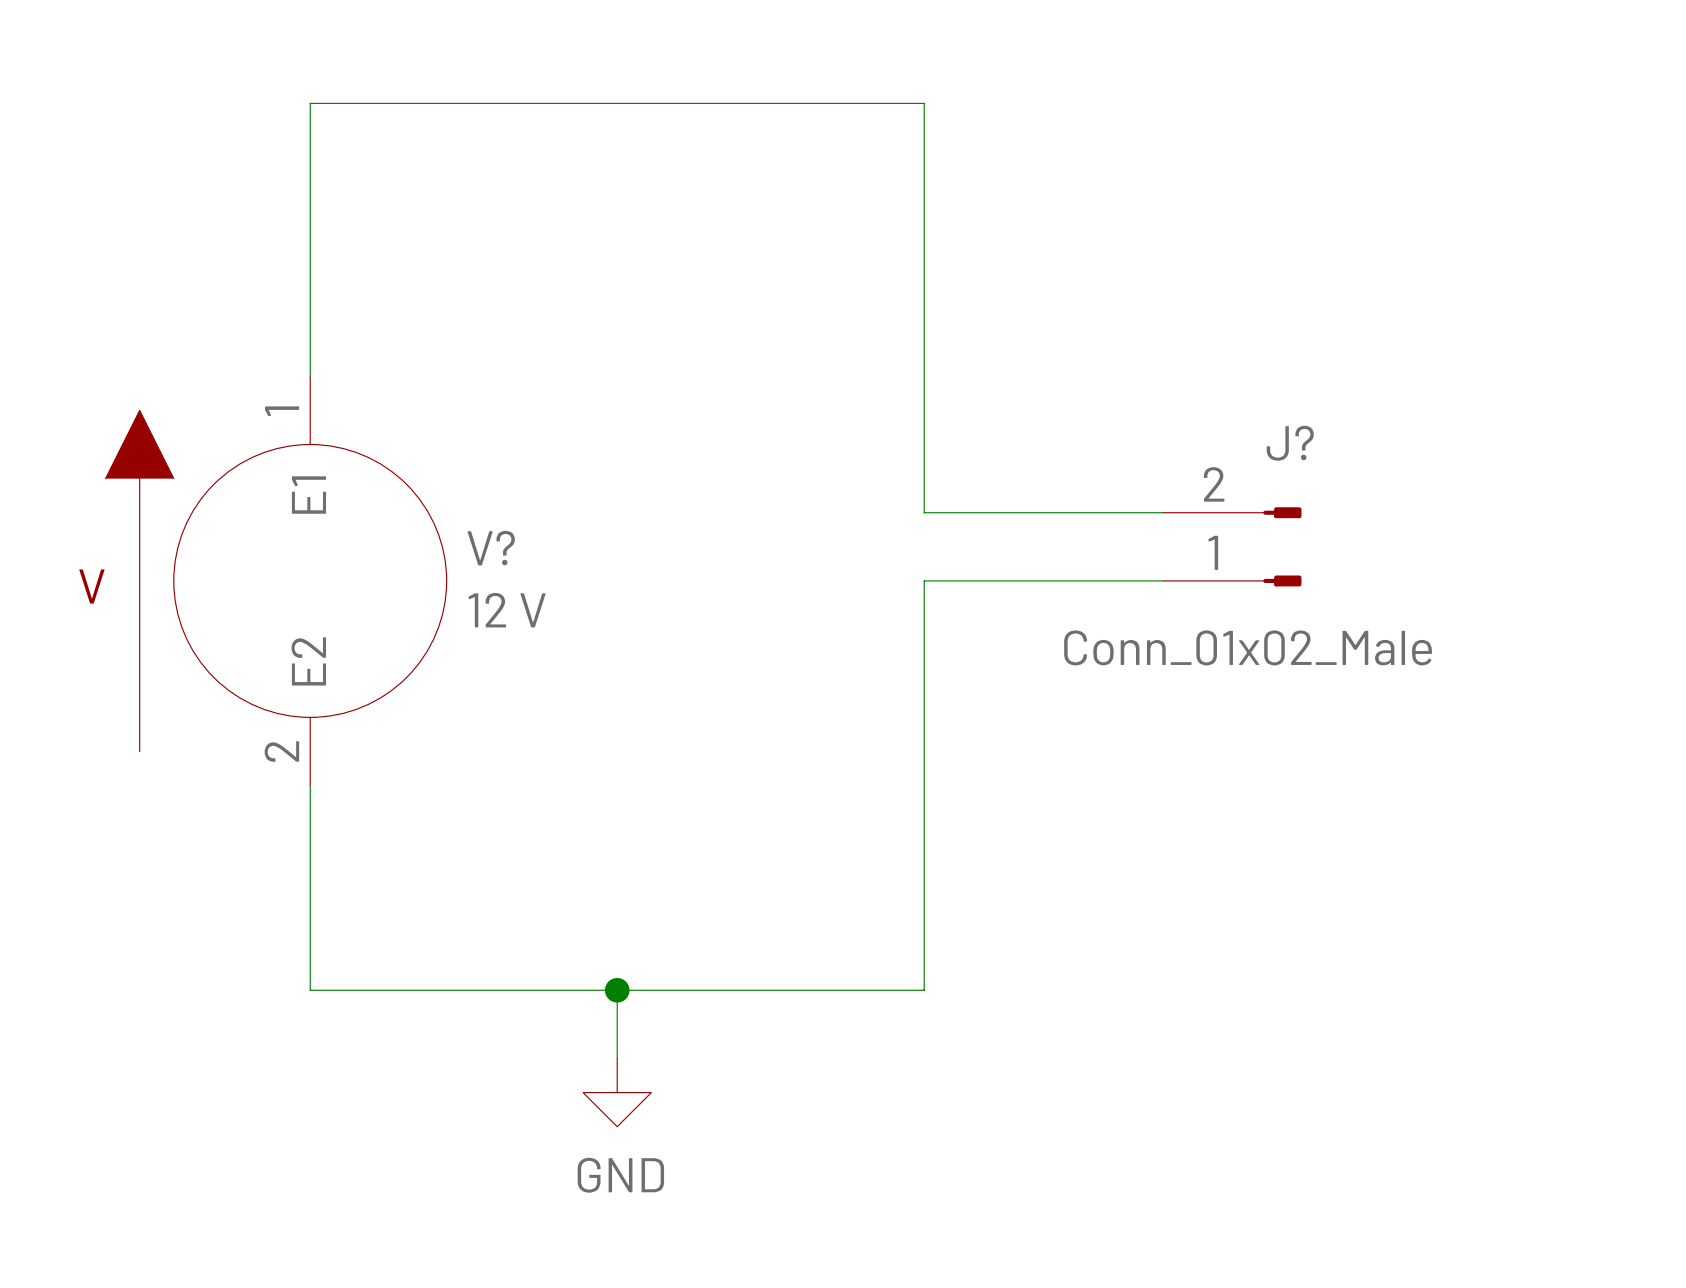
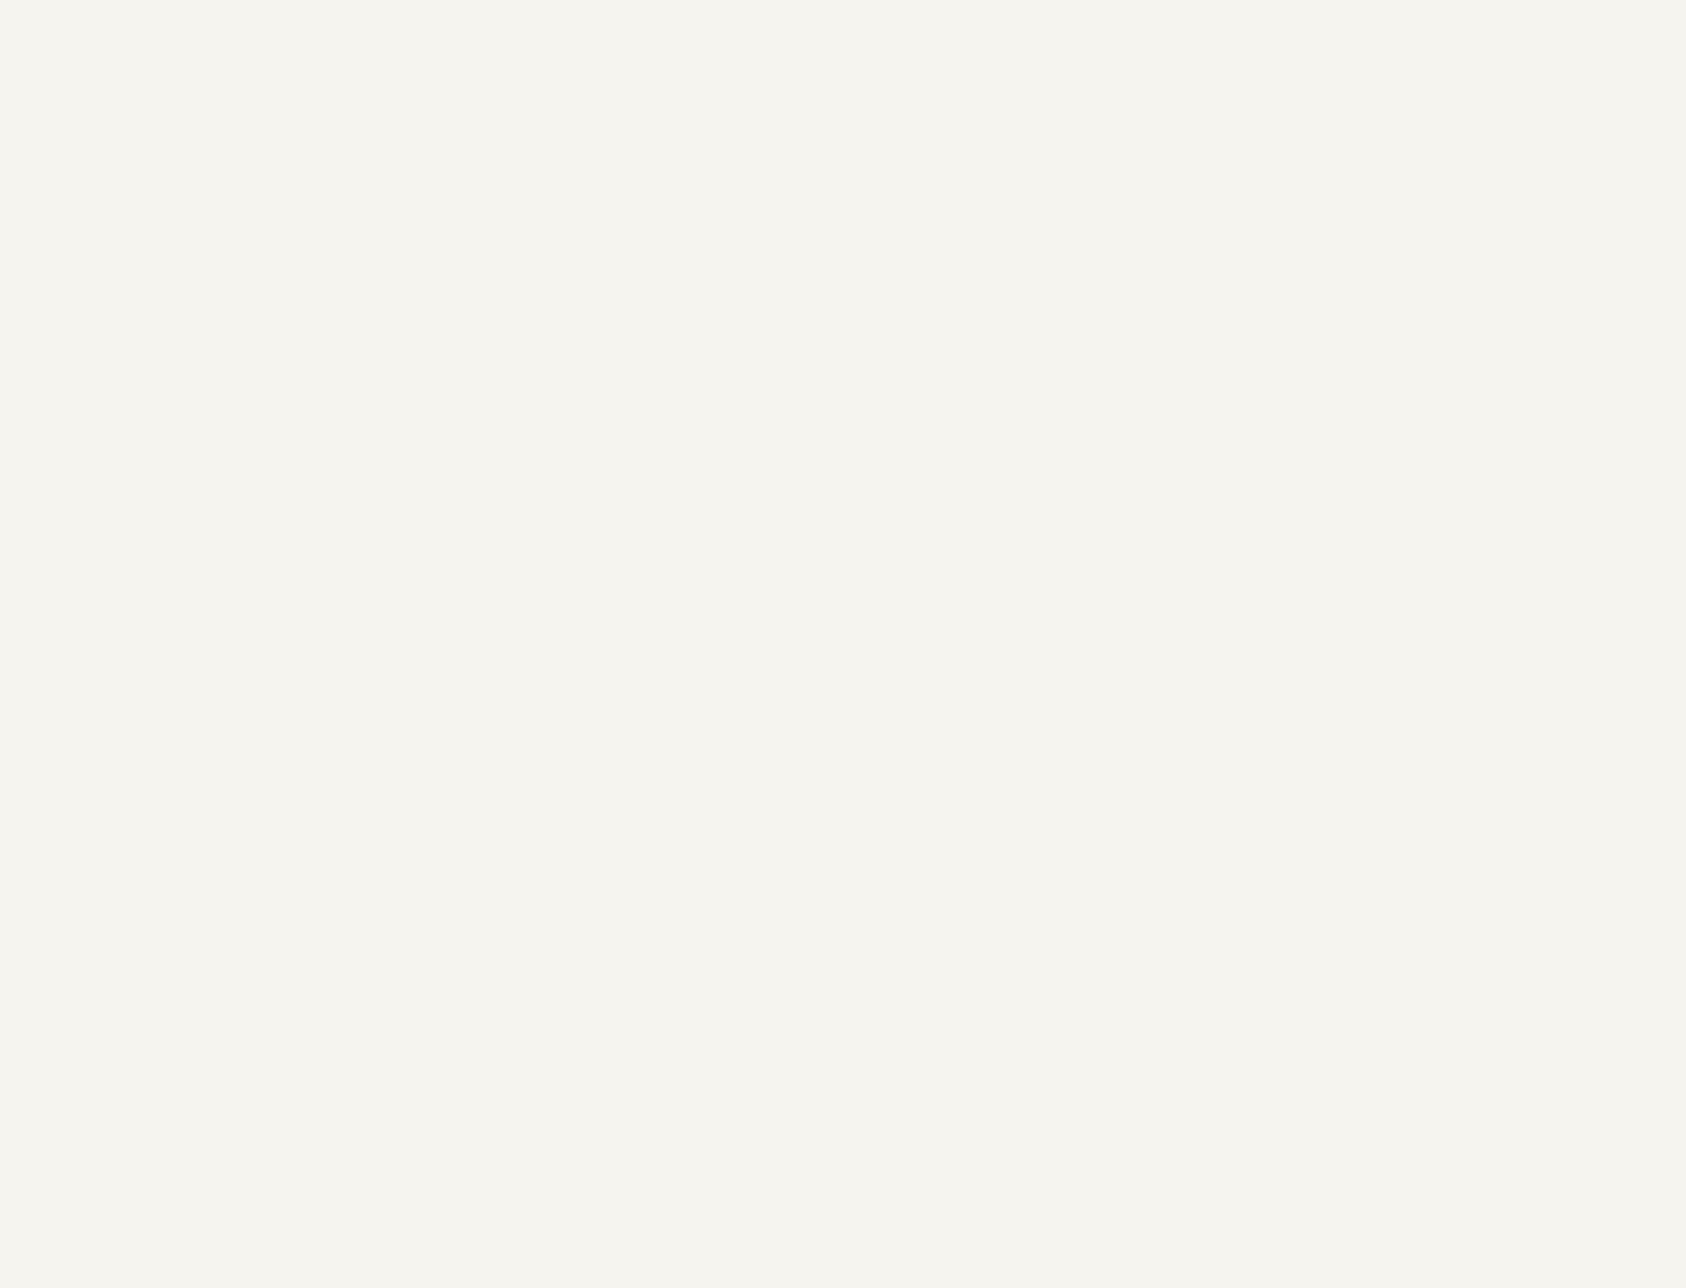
wire: (310, 376) (310, 103) (924, 103) (924, 512) (1162, 512) -> none
J?: Conn_01x02_Male (1232, 546) -> none
V?: 12 V (276, 580) -> none
wire: (1162, 580) (924, 580) (924, 990) (310, 990) (310, 785) -> none
wire: (617, 990) (617, 1058) -> none
junction: (617, 990) -> none
power symbol: GND (617, 1092) -> none

